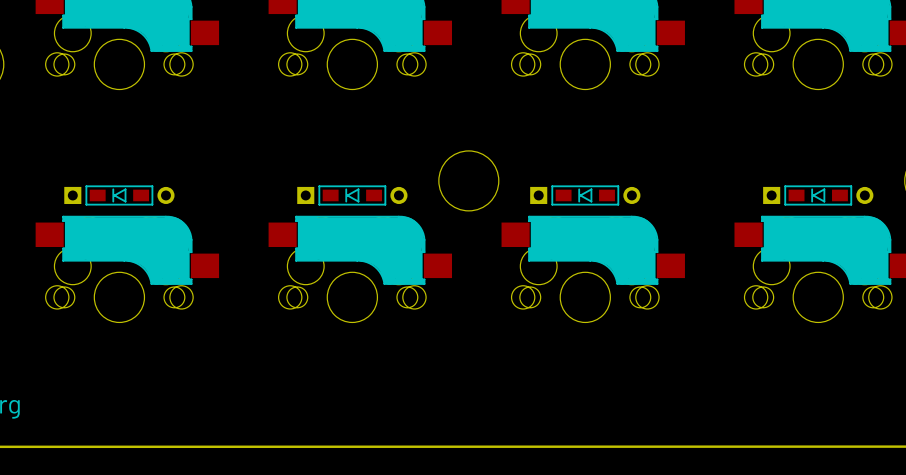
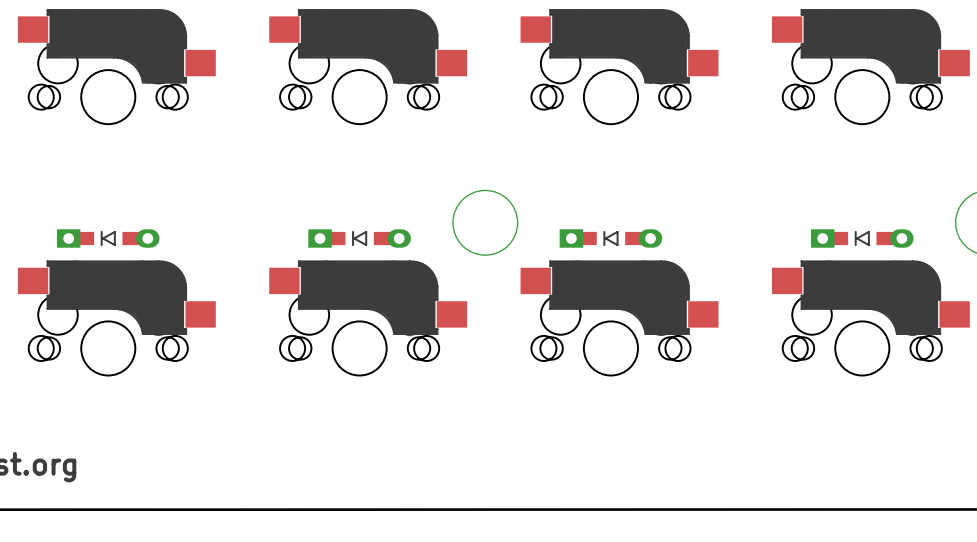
part footprint: [64, 185, 175, 206] -> [56, 229, 160, 248]
part footprint: [297, 185, 408, 206] -> [308, 229, 411, 248]
part footprint: [530, 185, 641, 206] -> [559, 229, 663, 248]
part footprint: [763, 185, 874, 206] -> [810, 229, 914, 248]

